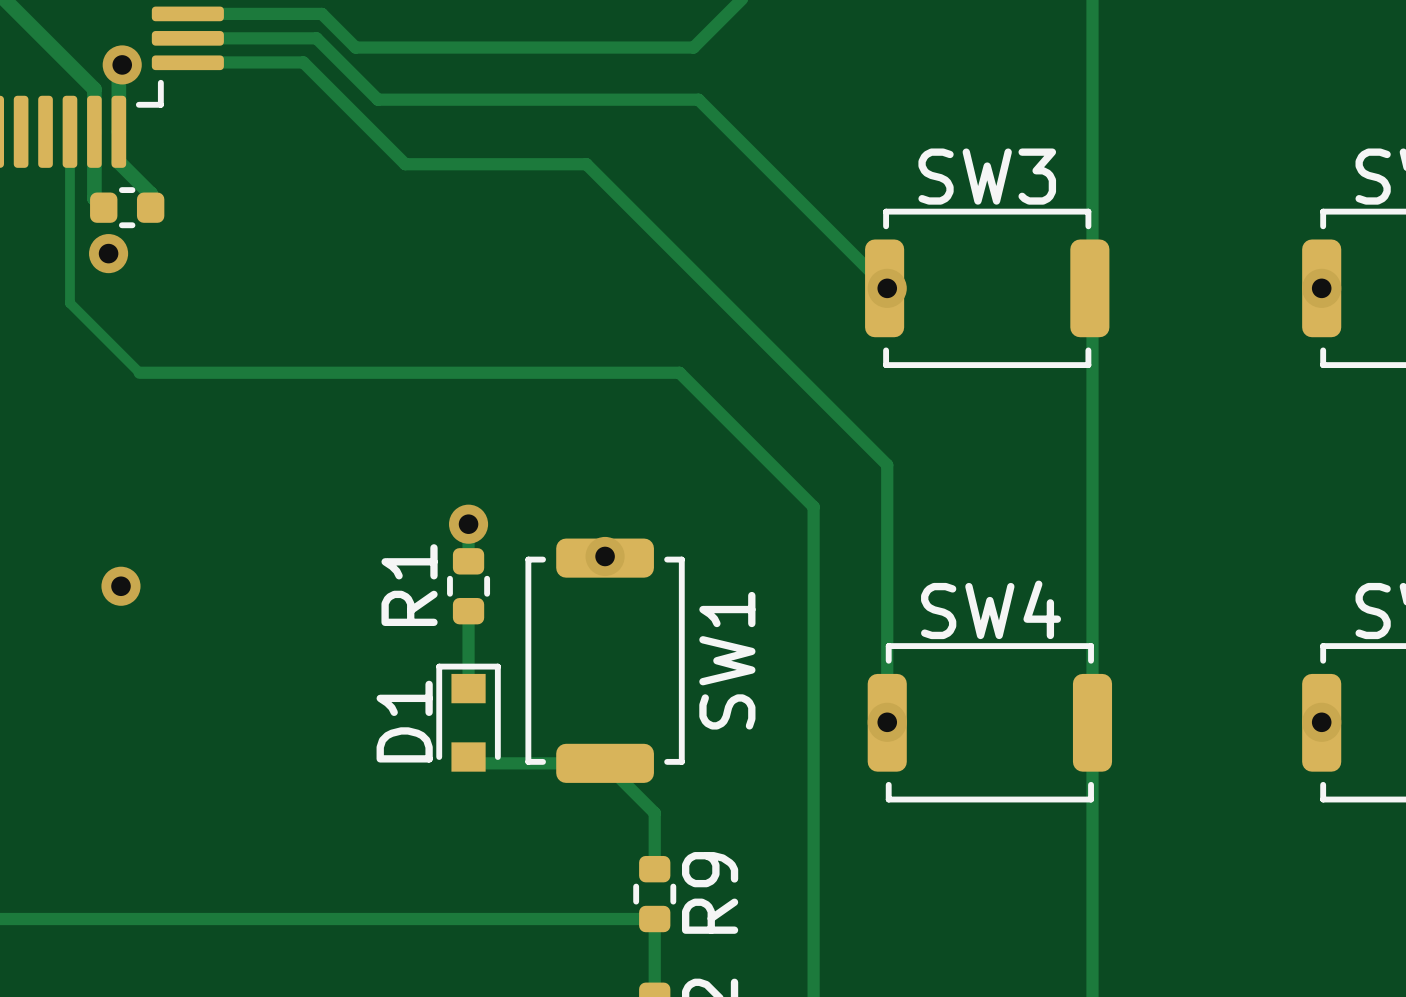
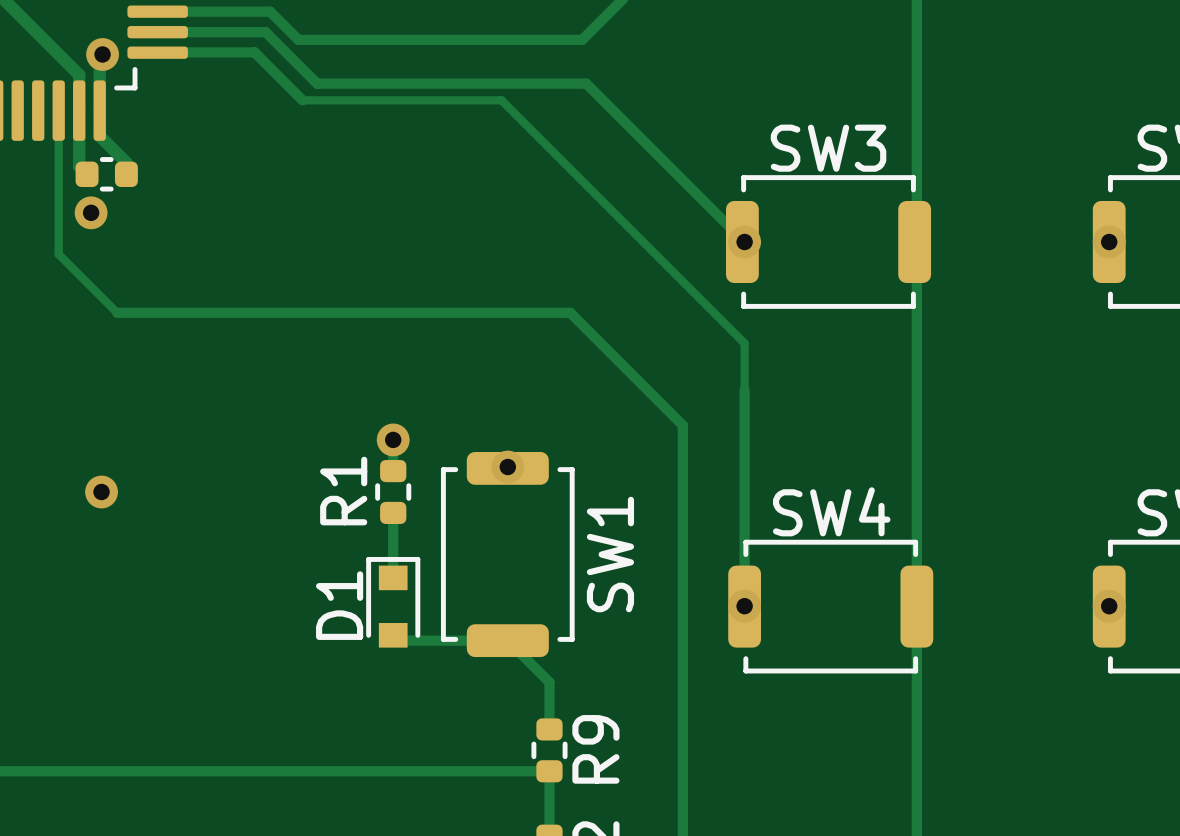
track: (360, 119) (405, 164) (586, 164) (887, 465) -> (302, 100) (501, 100) (744, 343) (744, 390)

